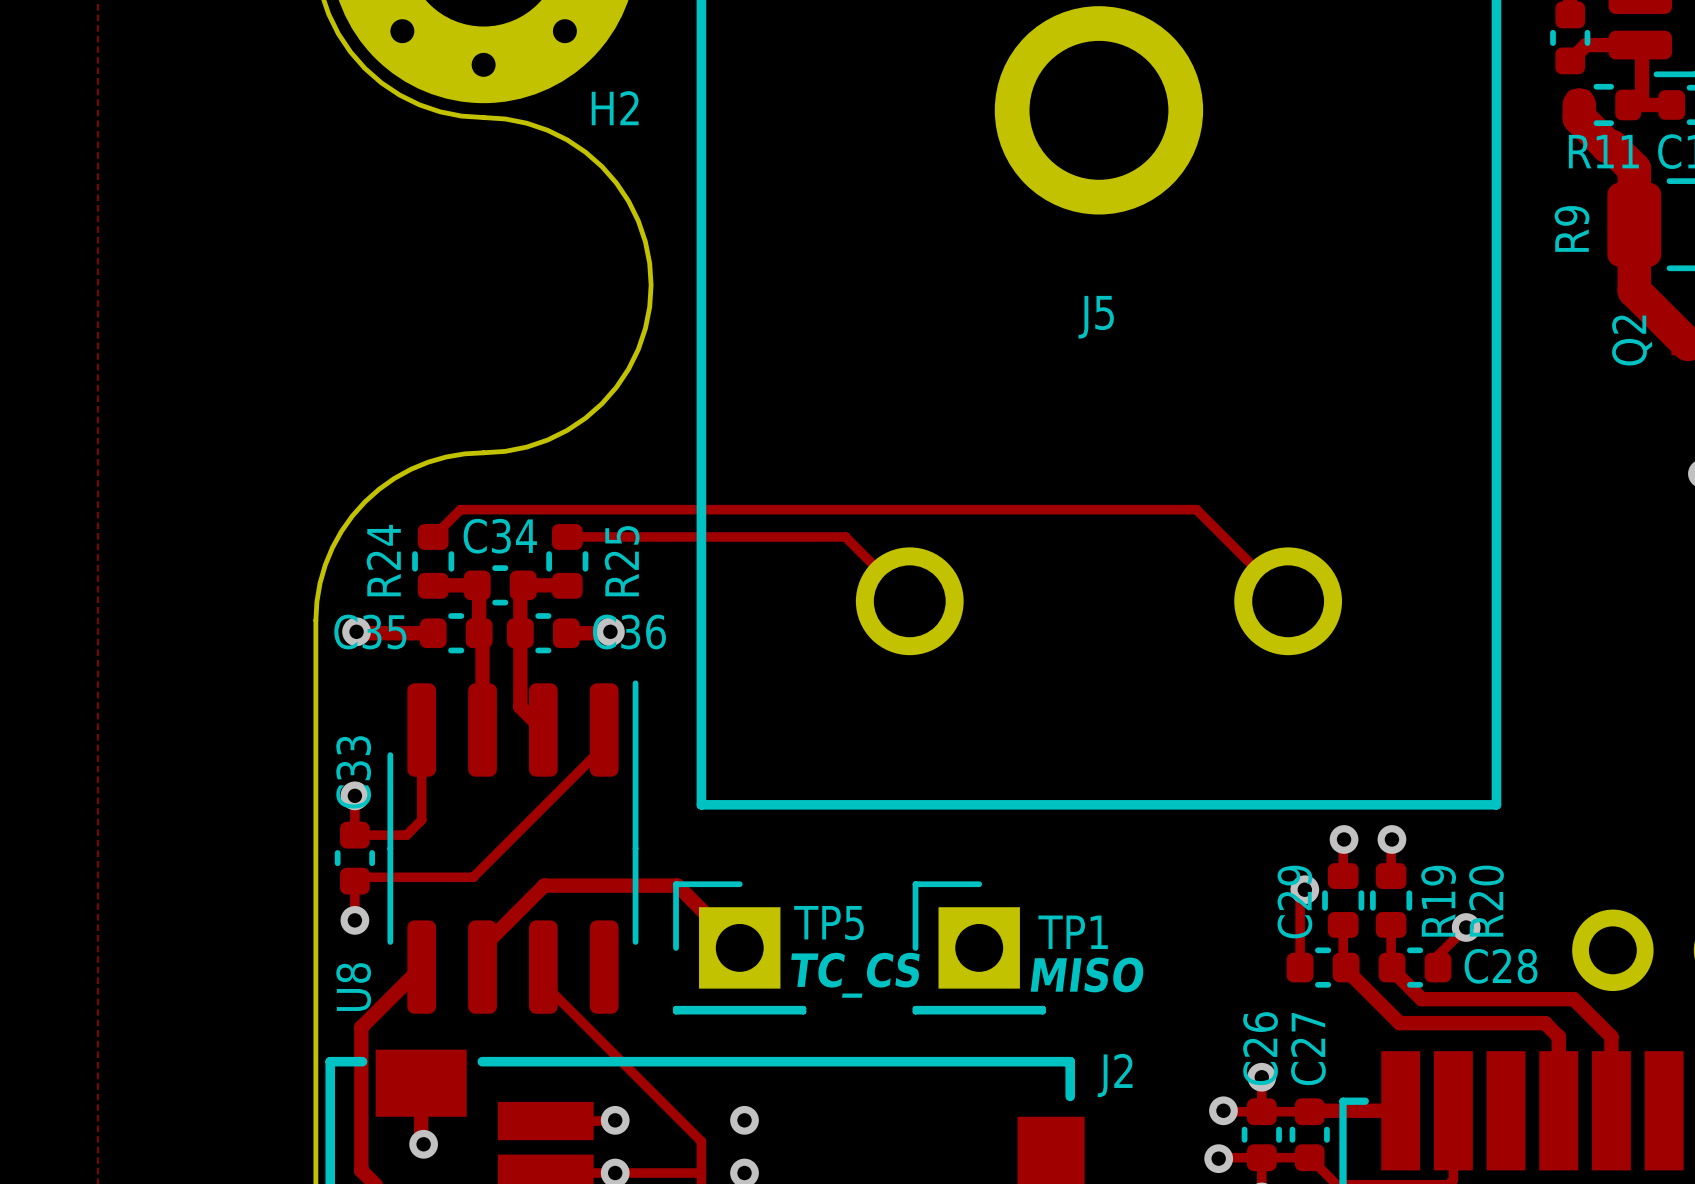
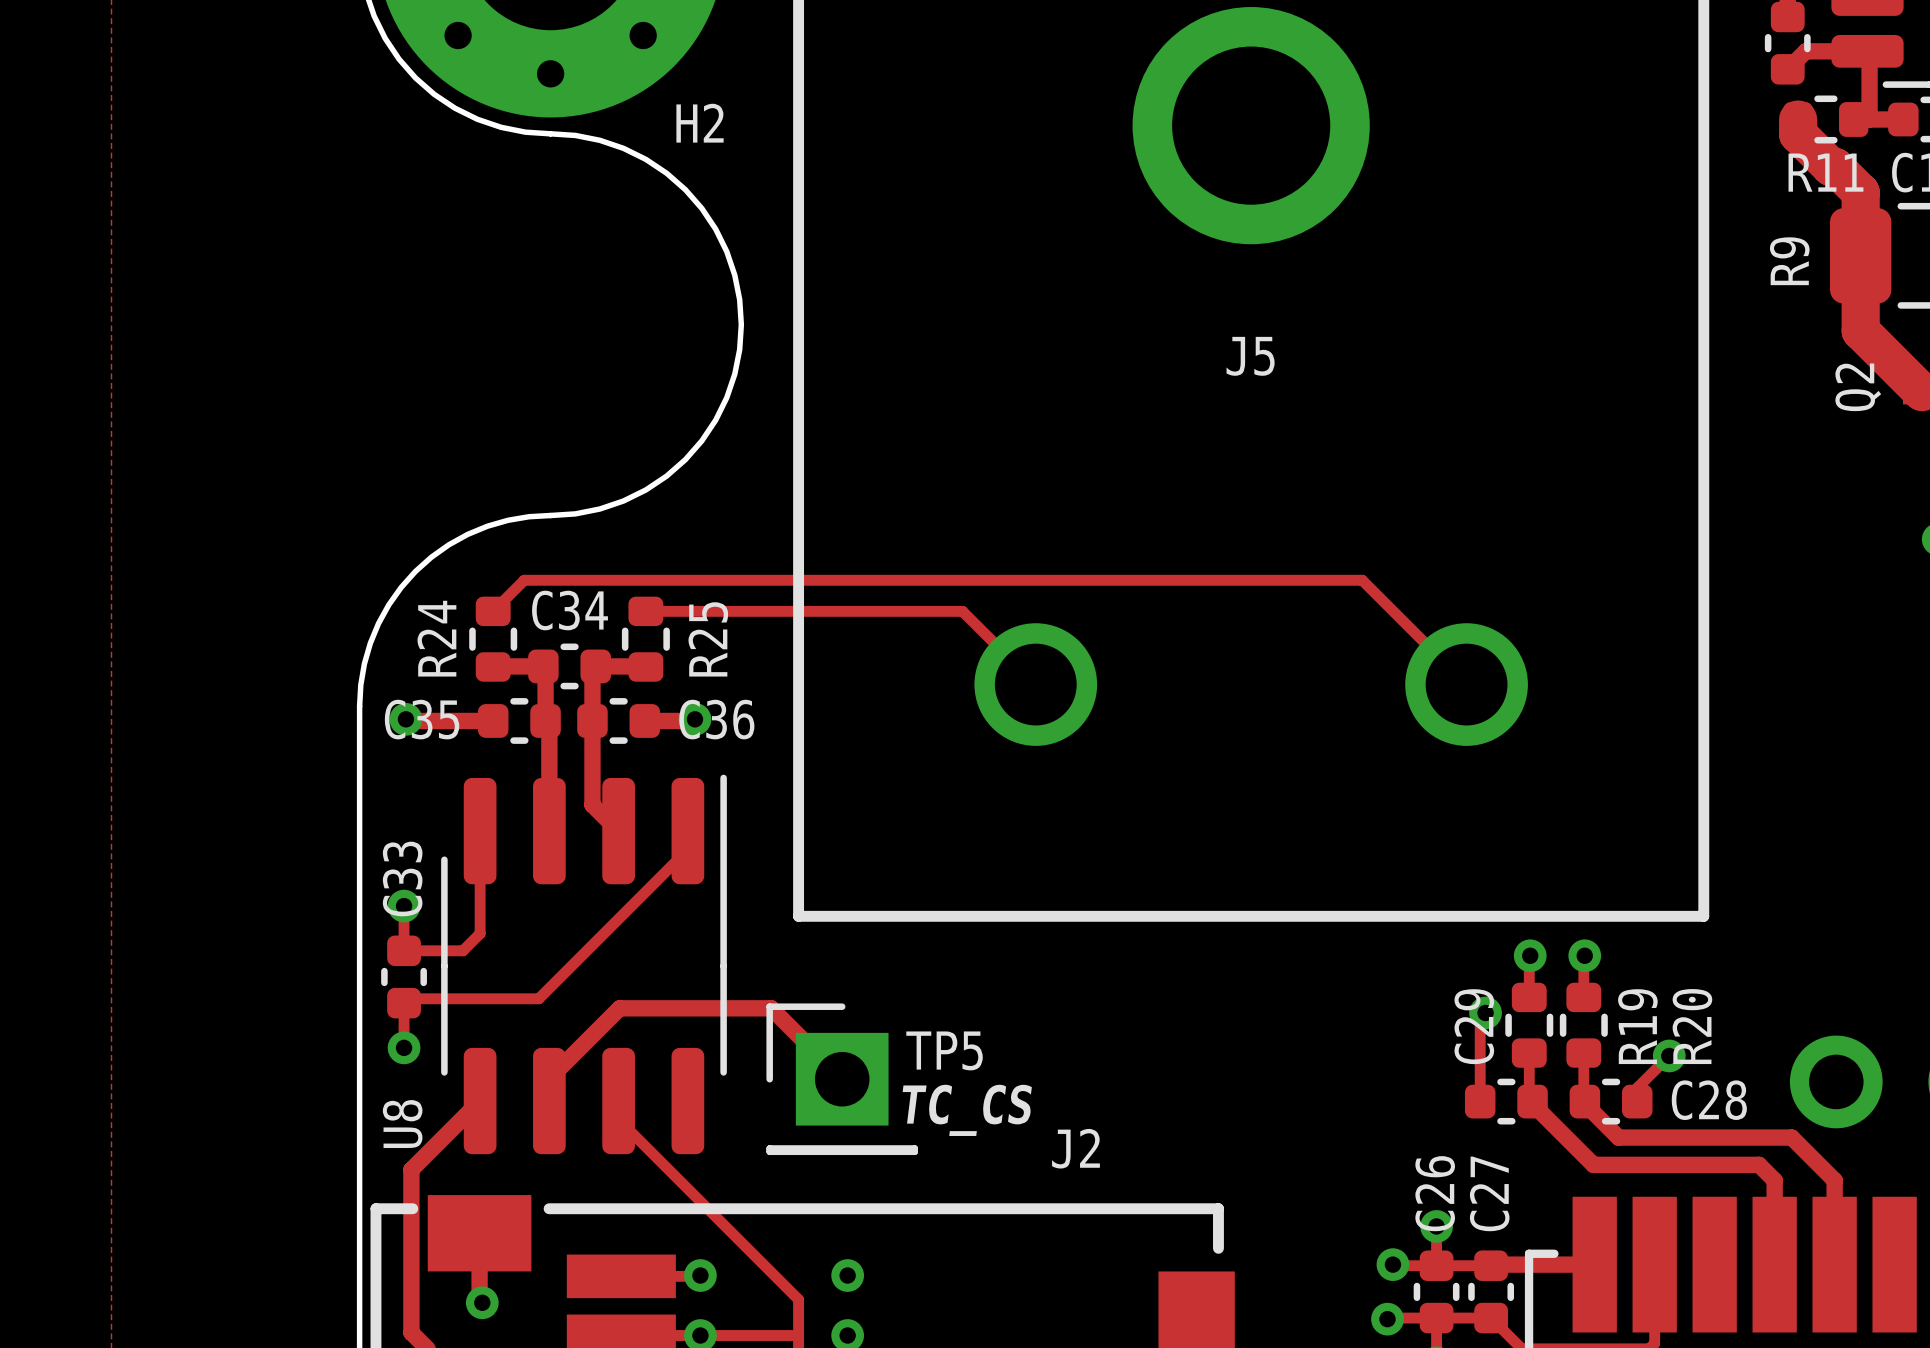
TP1: (979, 947) -> none
text: MISO (1087, 974) -> none
J2 name position: J2 (1115, 1075) -> J2 (1075, 1148)

